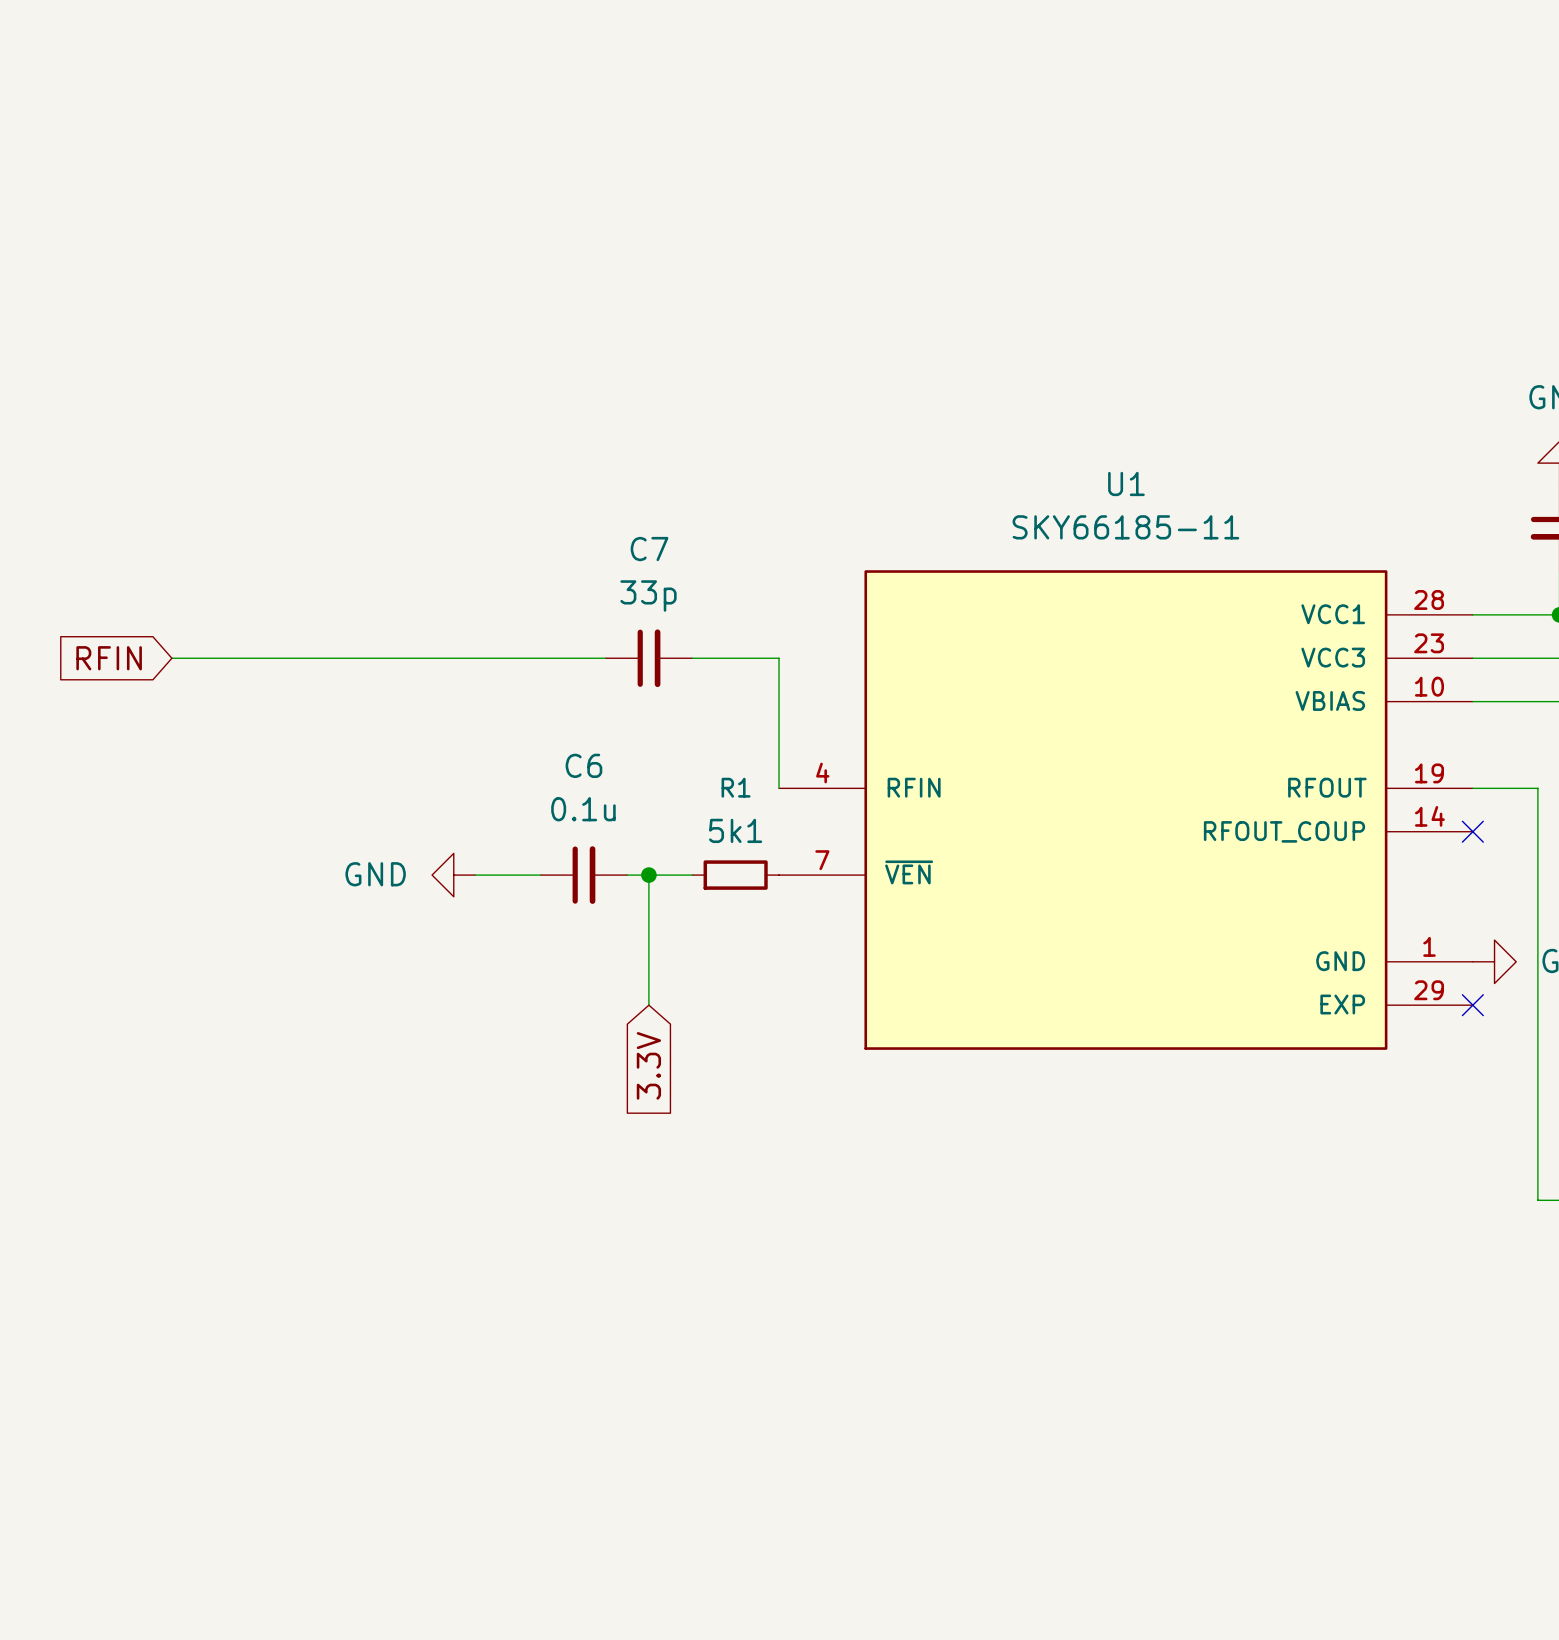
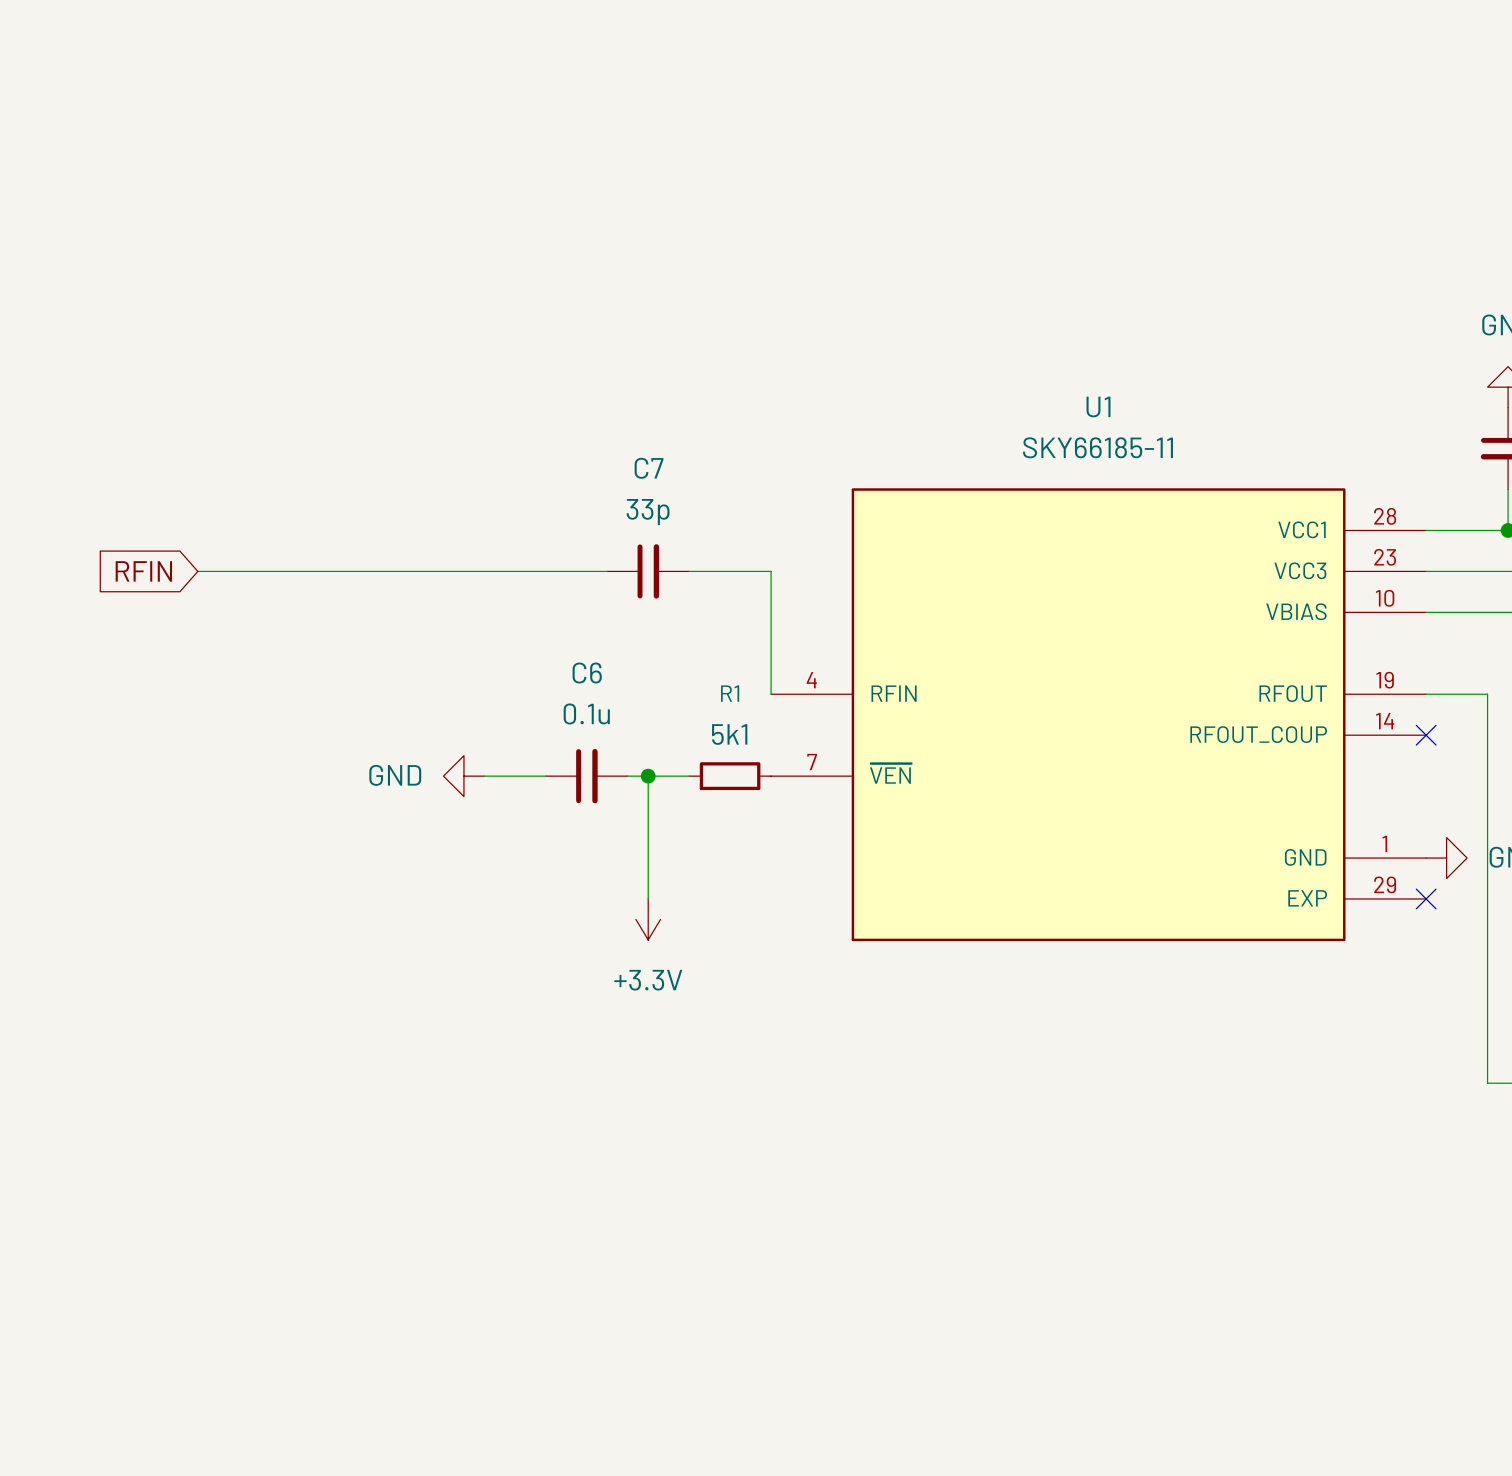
power symbol: none -> +3.3V (648, 919)
global label: 3.3V (648, 1065) -> none

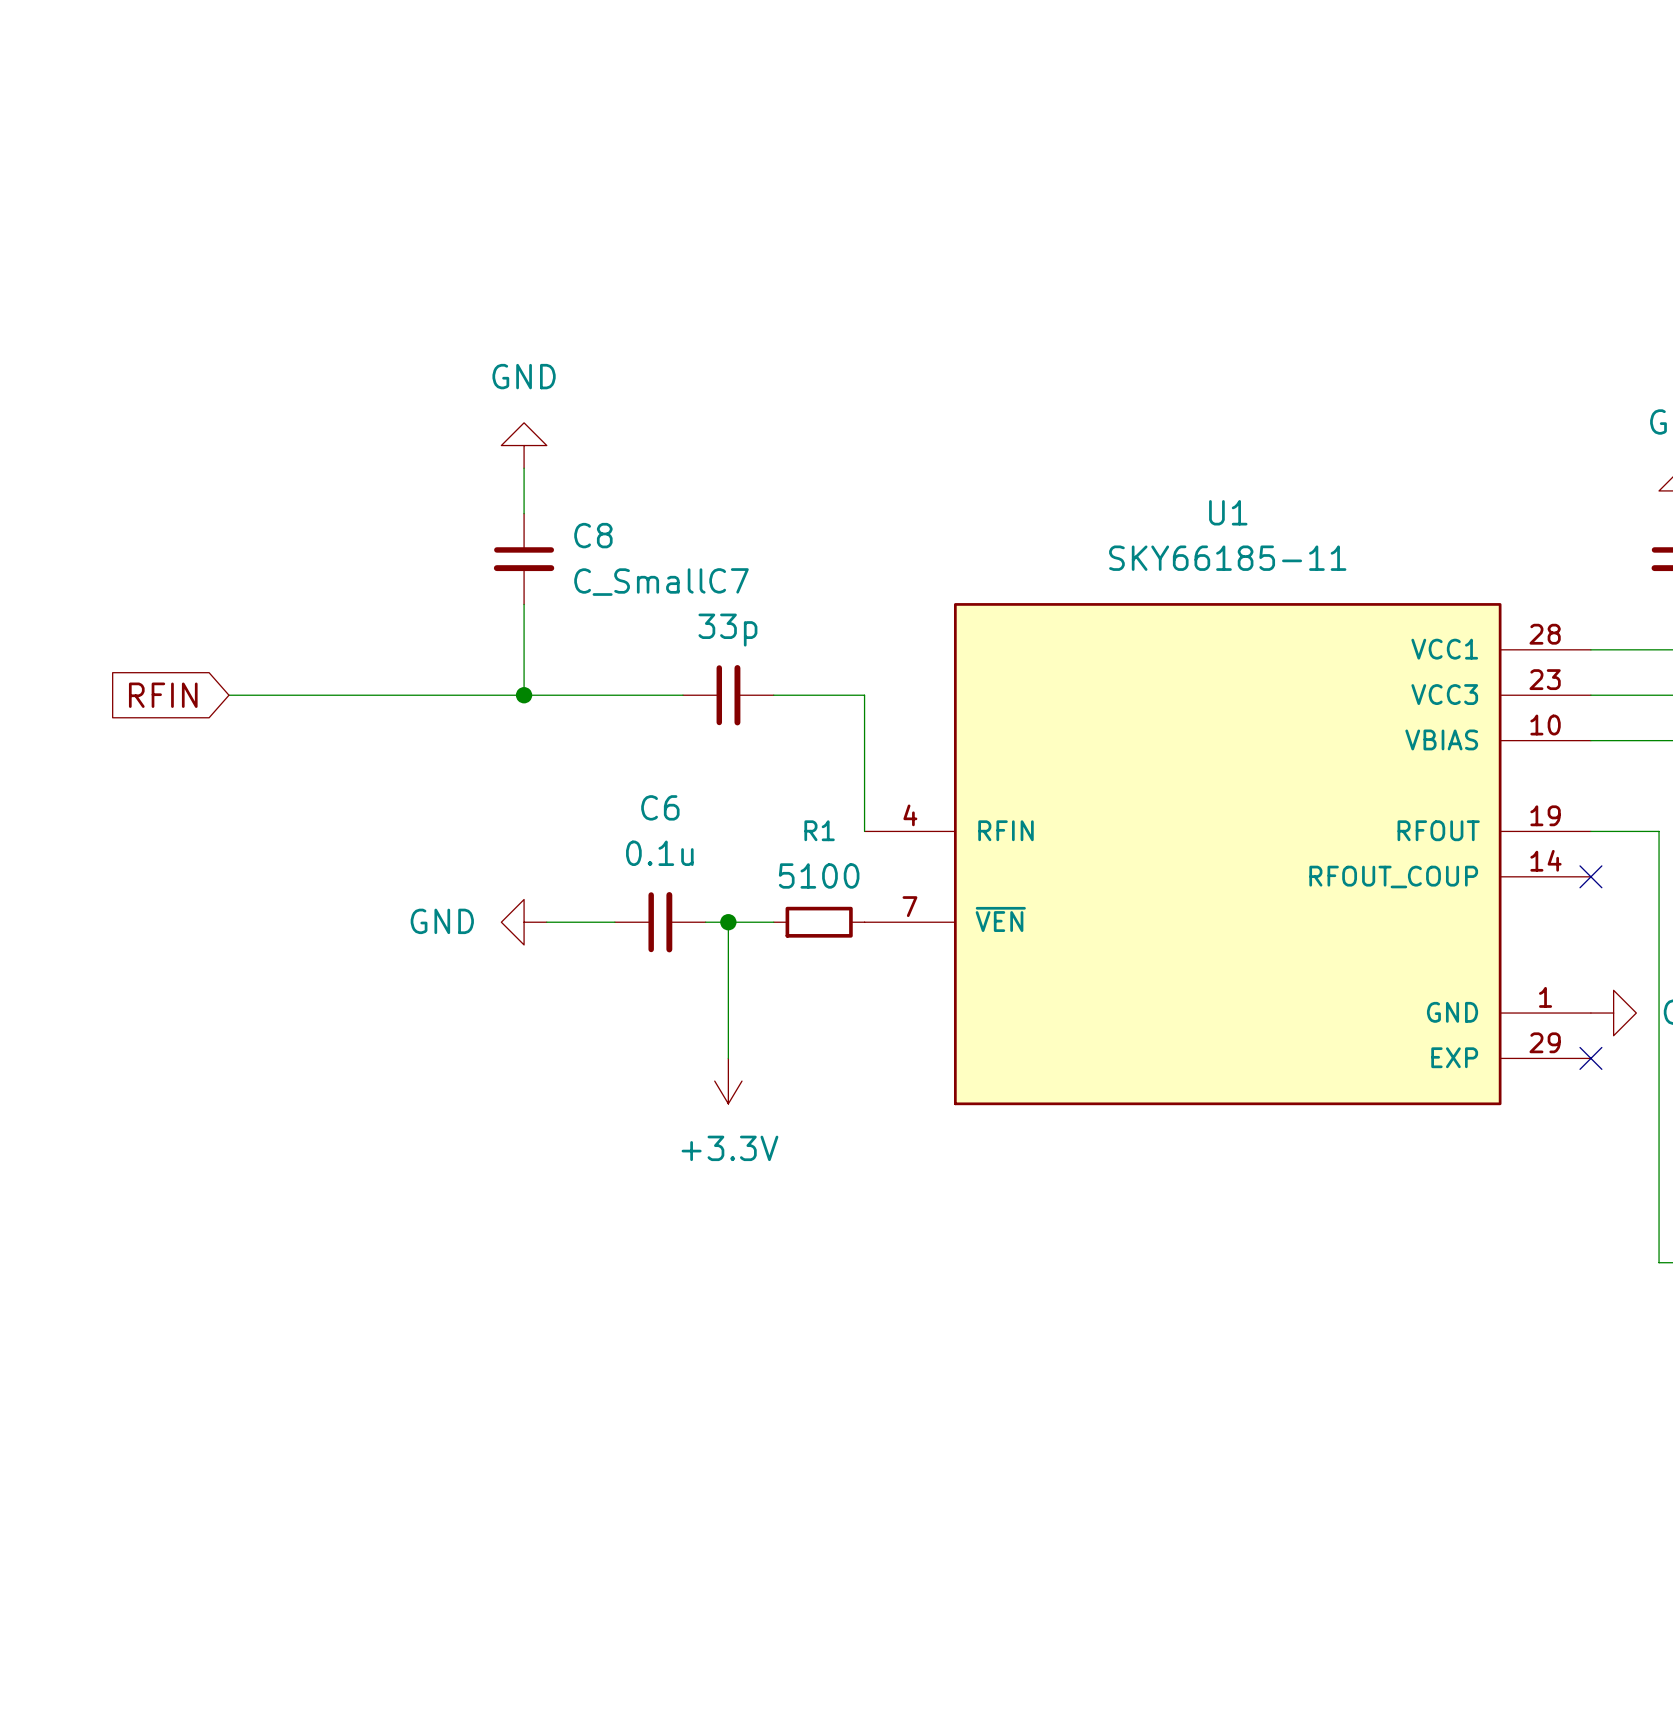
power symbol: none -> GND (524, 445)
wire: none -> (524, 468) (524, 513)
C8: none -> C_Small (524, 559)
wire: none -> (524, 604) (524, 695)
junction: none -> (524, 695)
R1 value: 5k1 (729, 734) -> 5100 (819, 875)

